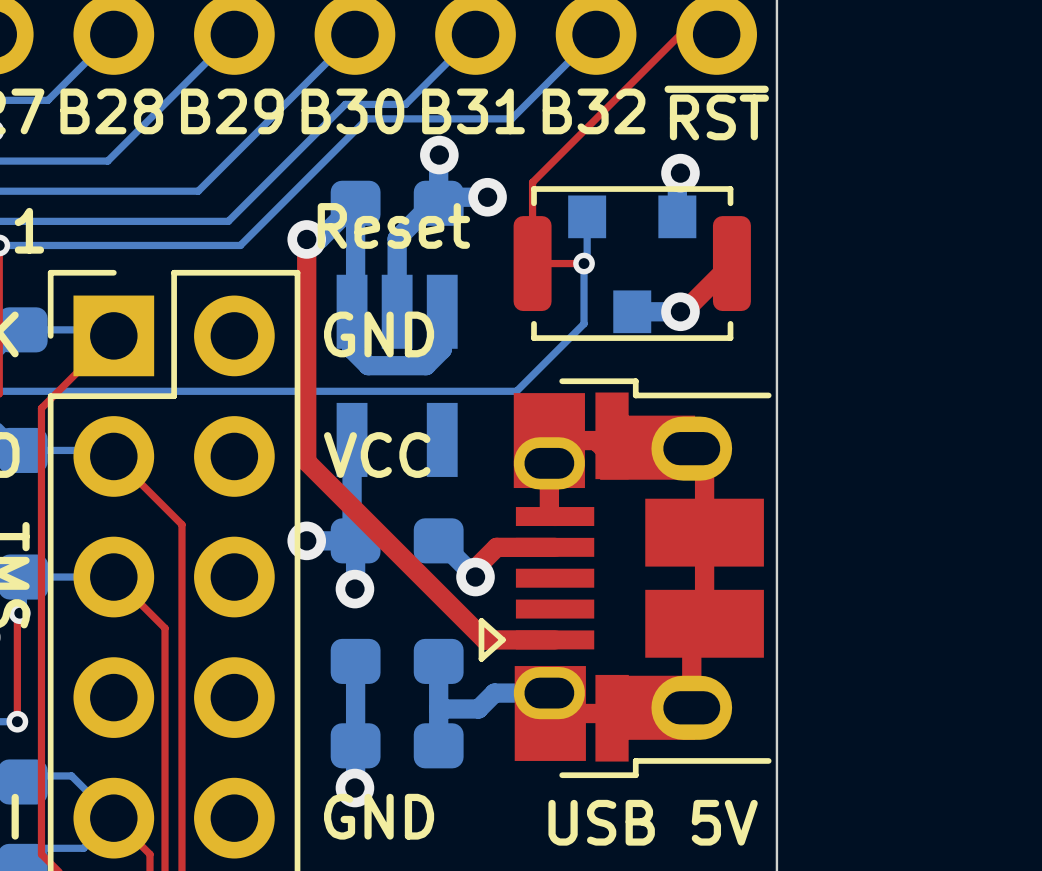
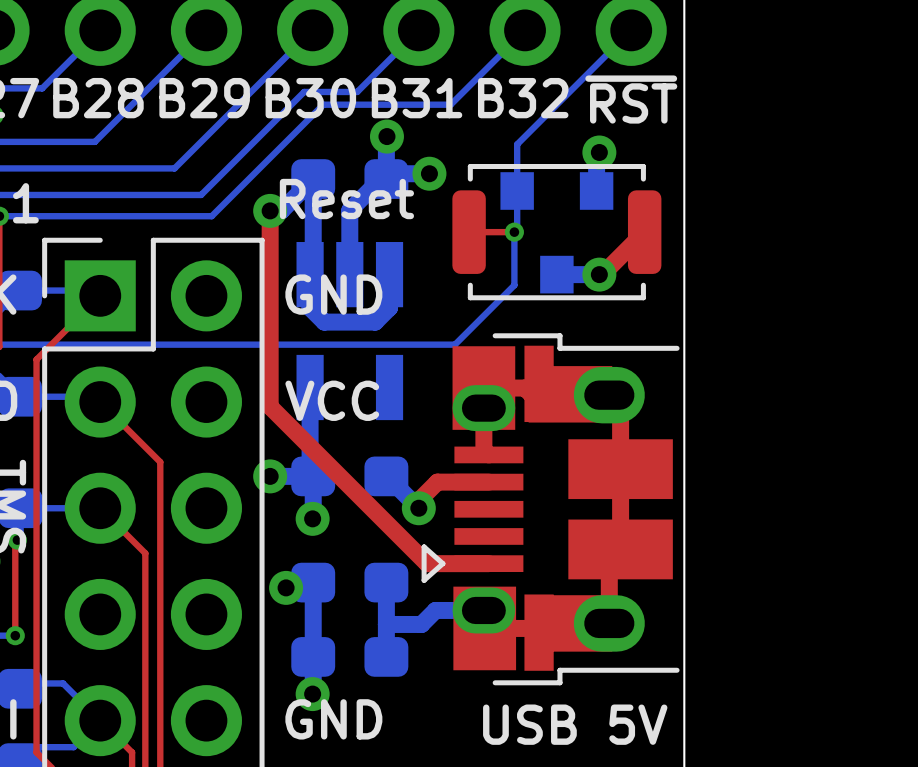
top track: (680, 34) (532, 182) (532, 263) -> none
bottom track: none -> (631, 30) (517, 144) (517, 191)
via: none -> (286, 587)

